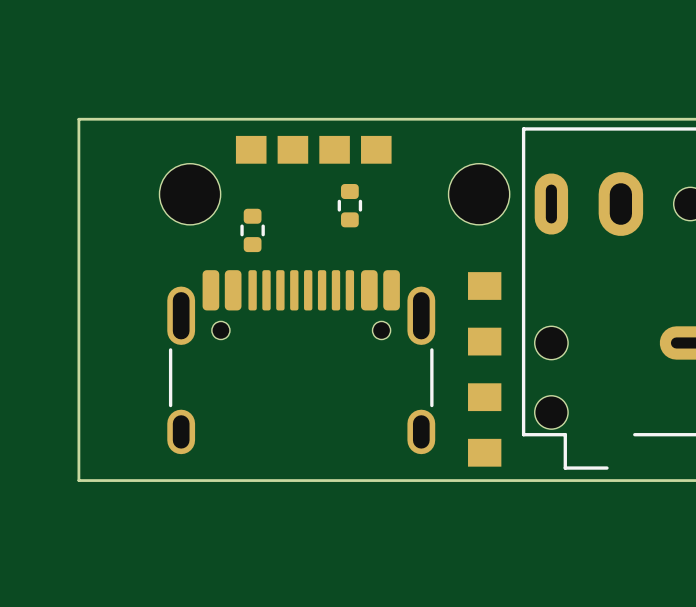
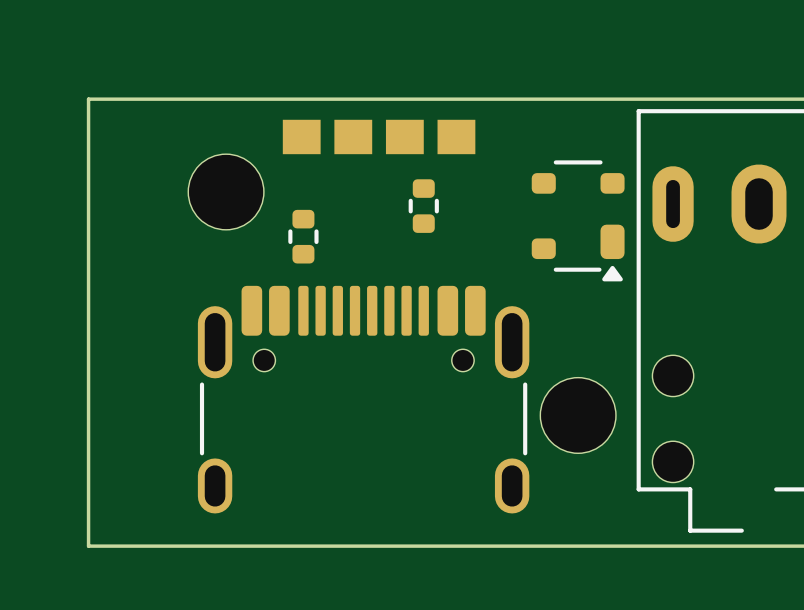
part footprint: [448, 163, 510, 225] -> [531, 160, 625, 282]
part: (484, 286) -> none
part: (484, 341) -> none
part: none -> (578, 415)
part: (484, 397) -> none
part: (484, 452) -> none

